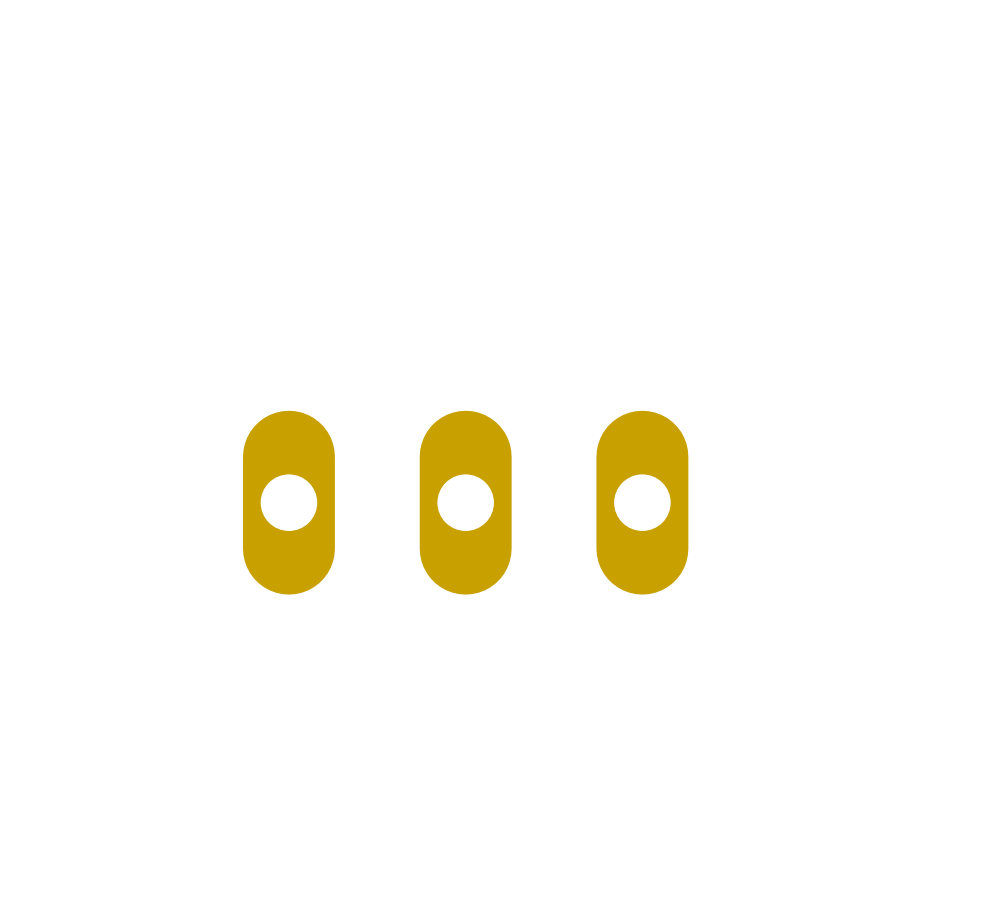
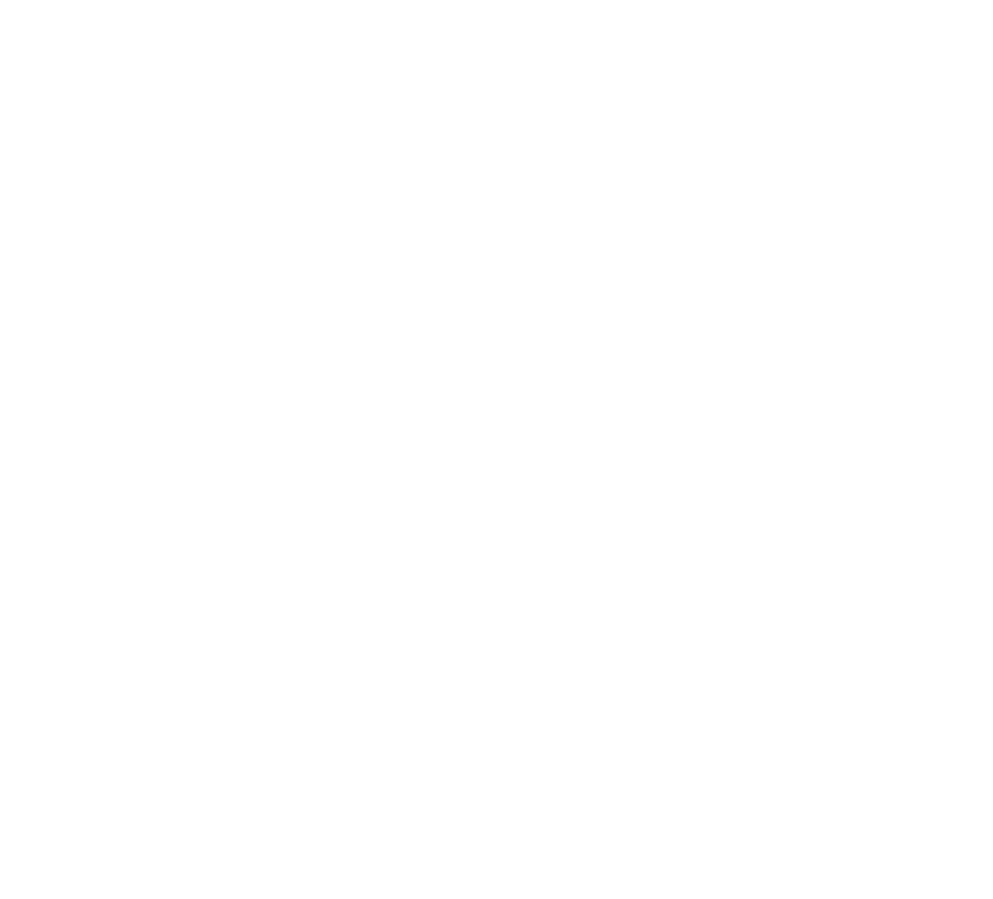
part: (465, 502) -> none

